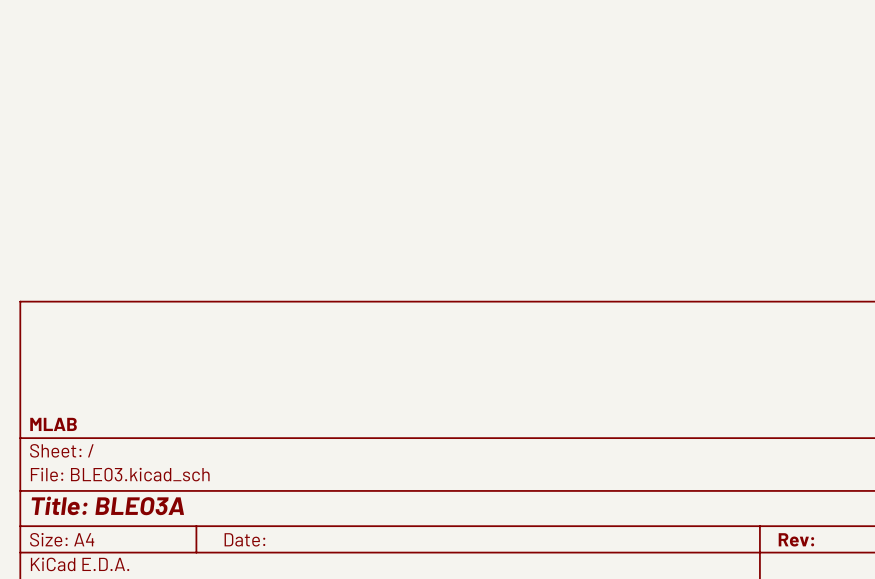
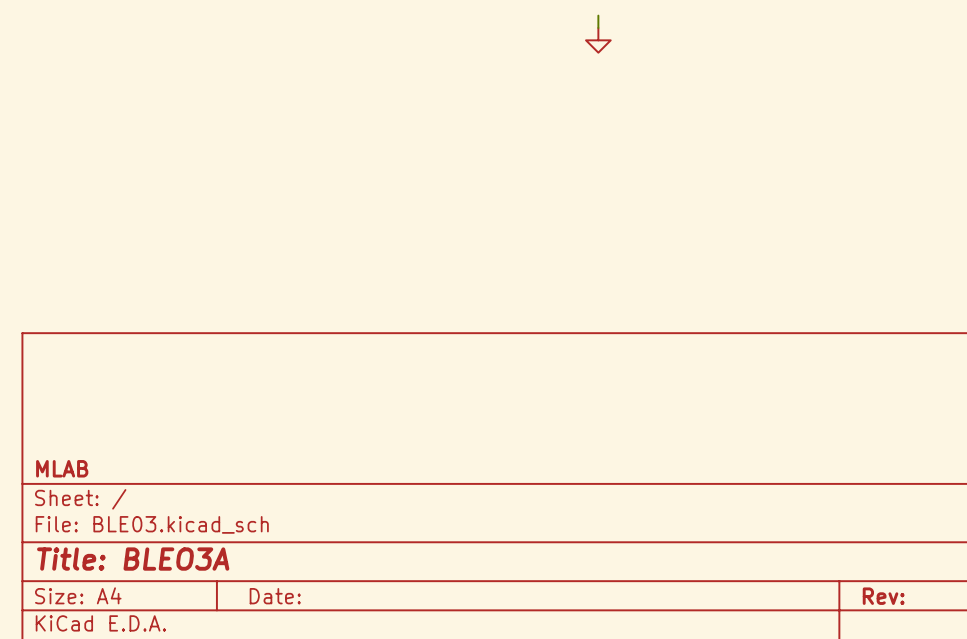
wire: none -> (598, 15) (598, 27)
power symbol: none -> (598, 40)

